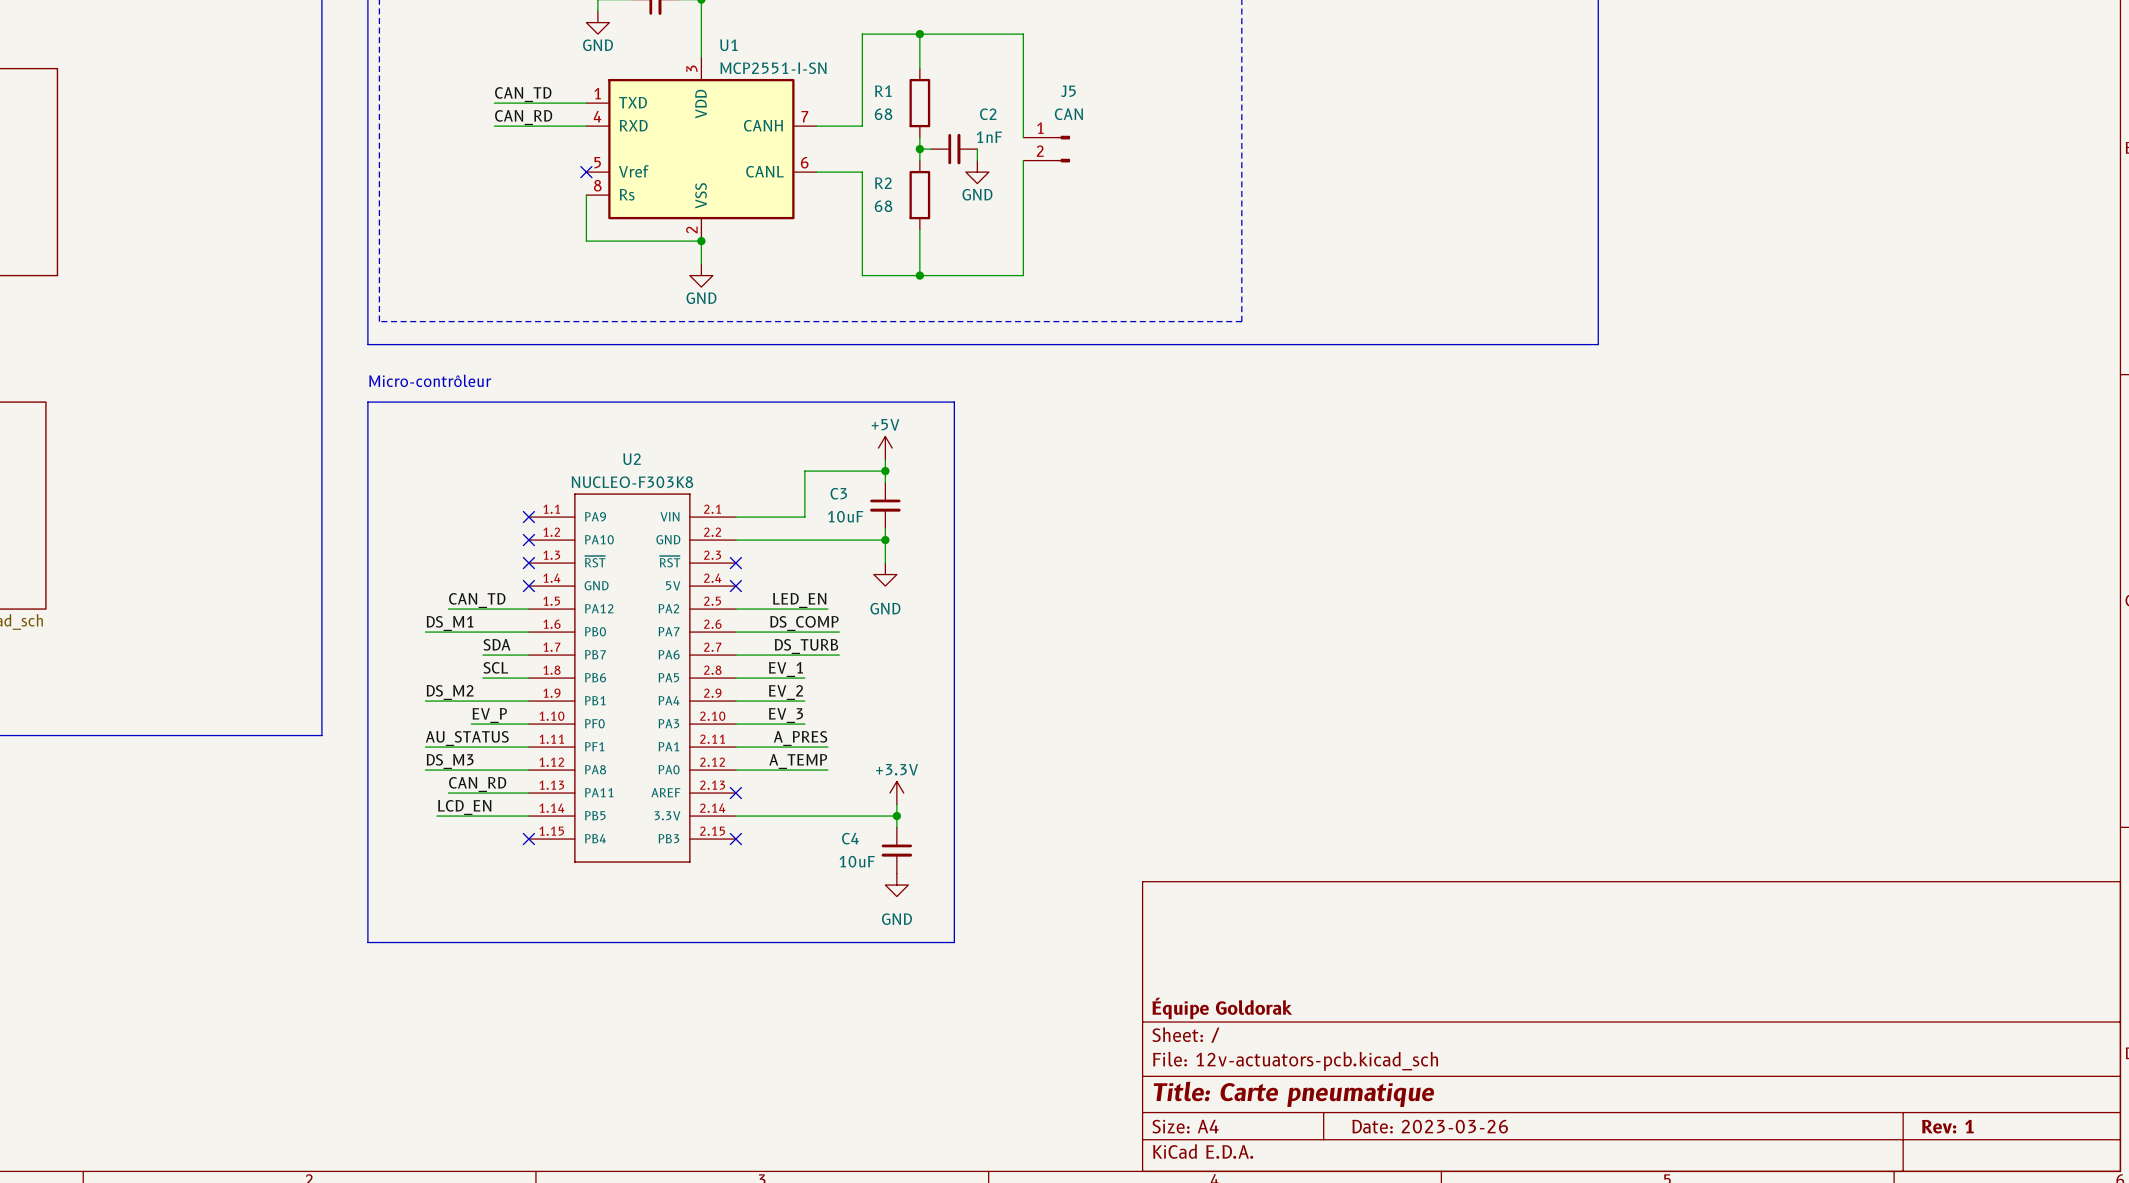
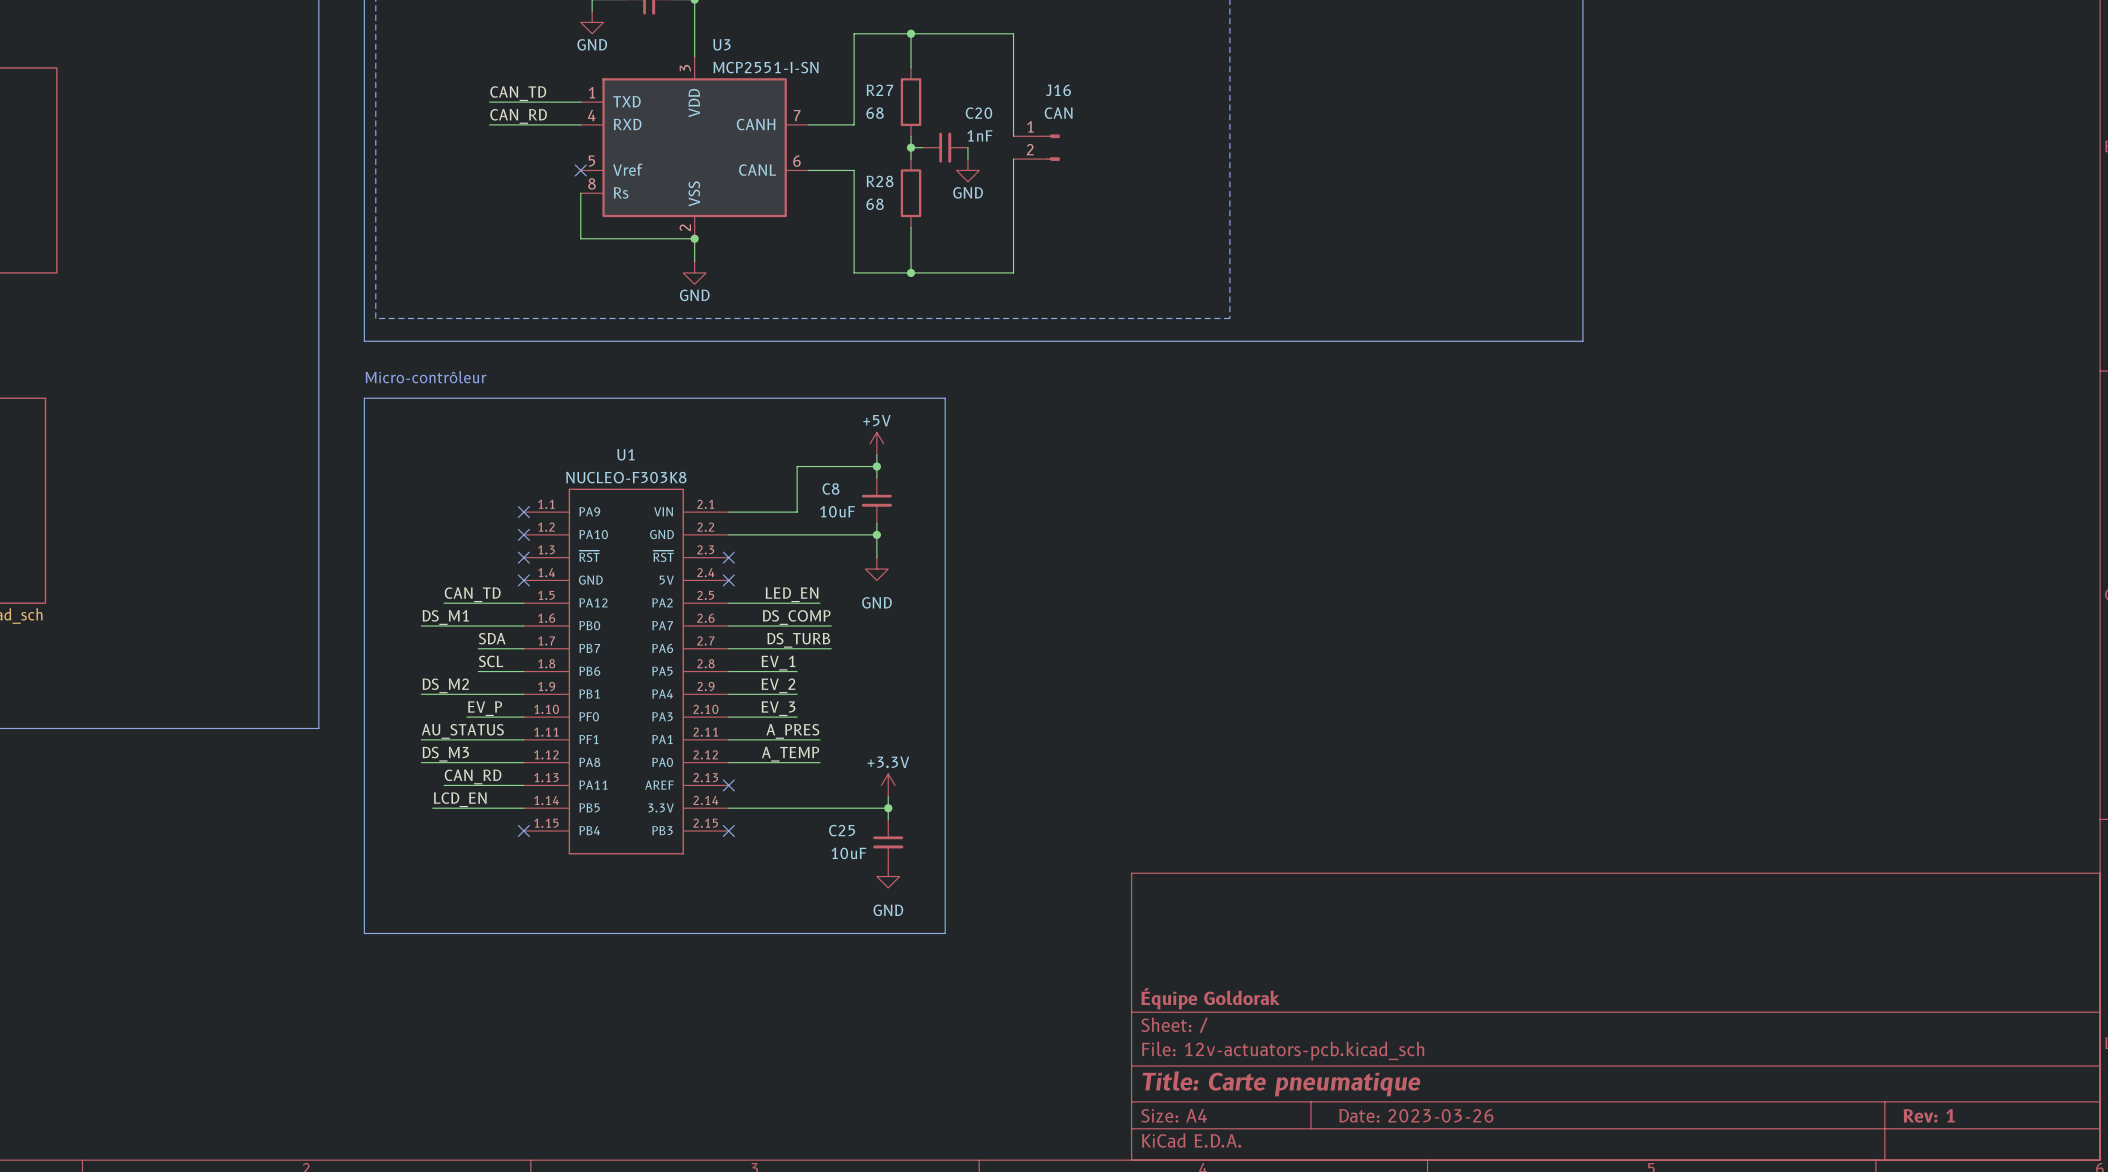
U1 name: U1 (728, 45) -> U3 (721, 44)
R1 name: R1 (883, 91) -> R27 (879, 90)
J5 name: J5 (1068, 91) -> J16 (1058, 90)
C2 name: C2 (988, 114) -> C20 (978, 113)
R2 name: R2 (883, 183) -> R28 (880, 181)
U2 name: U2 (632, 459) -> U1 (625, 454)
C3 name: C3 (838, 493) -> C8 (831, 488)
C4 name: C4 (850, 838) -> C25 (842, 830)

